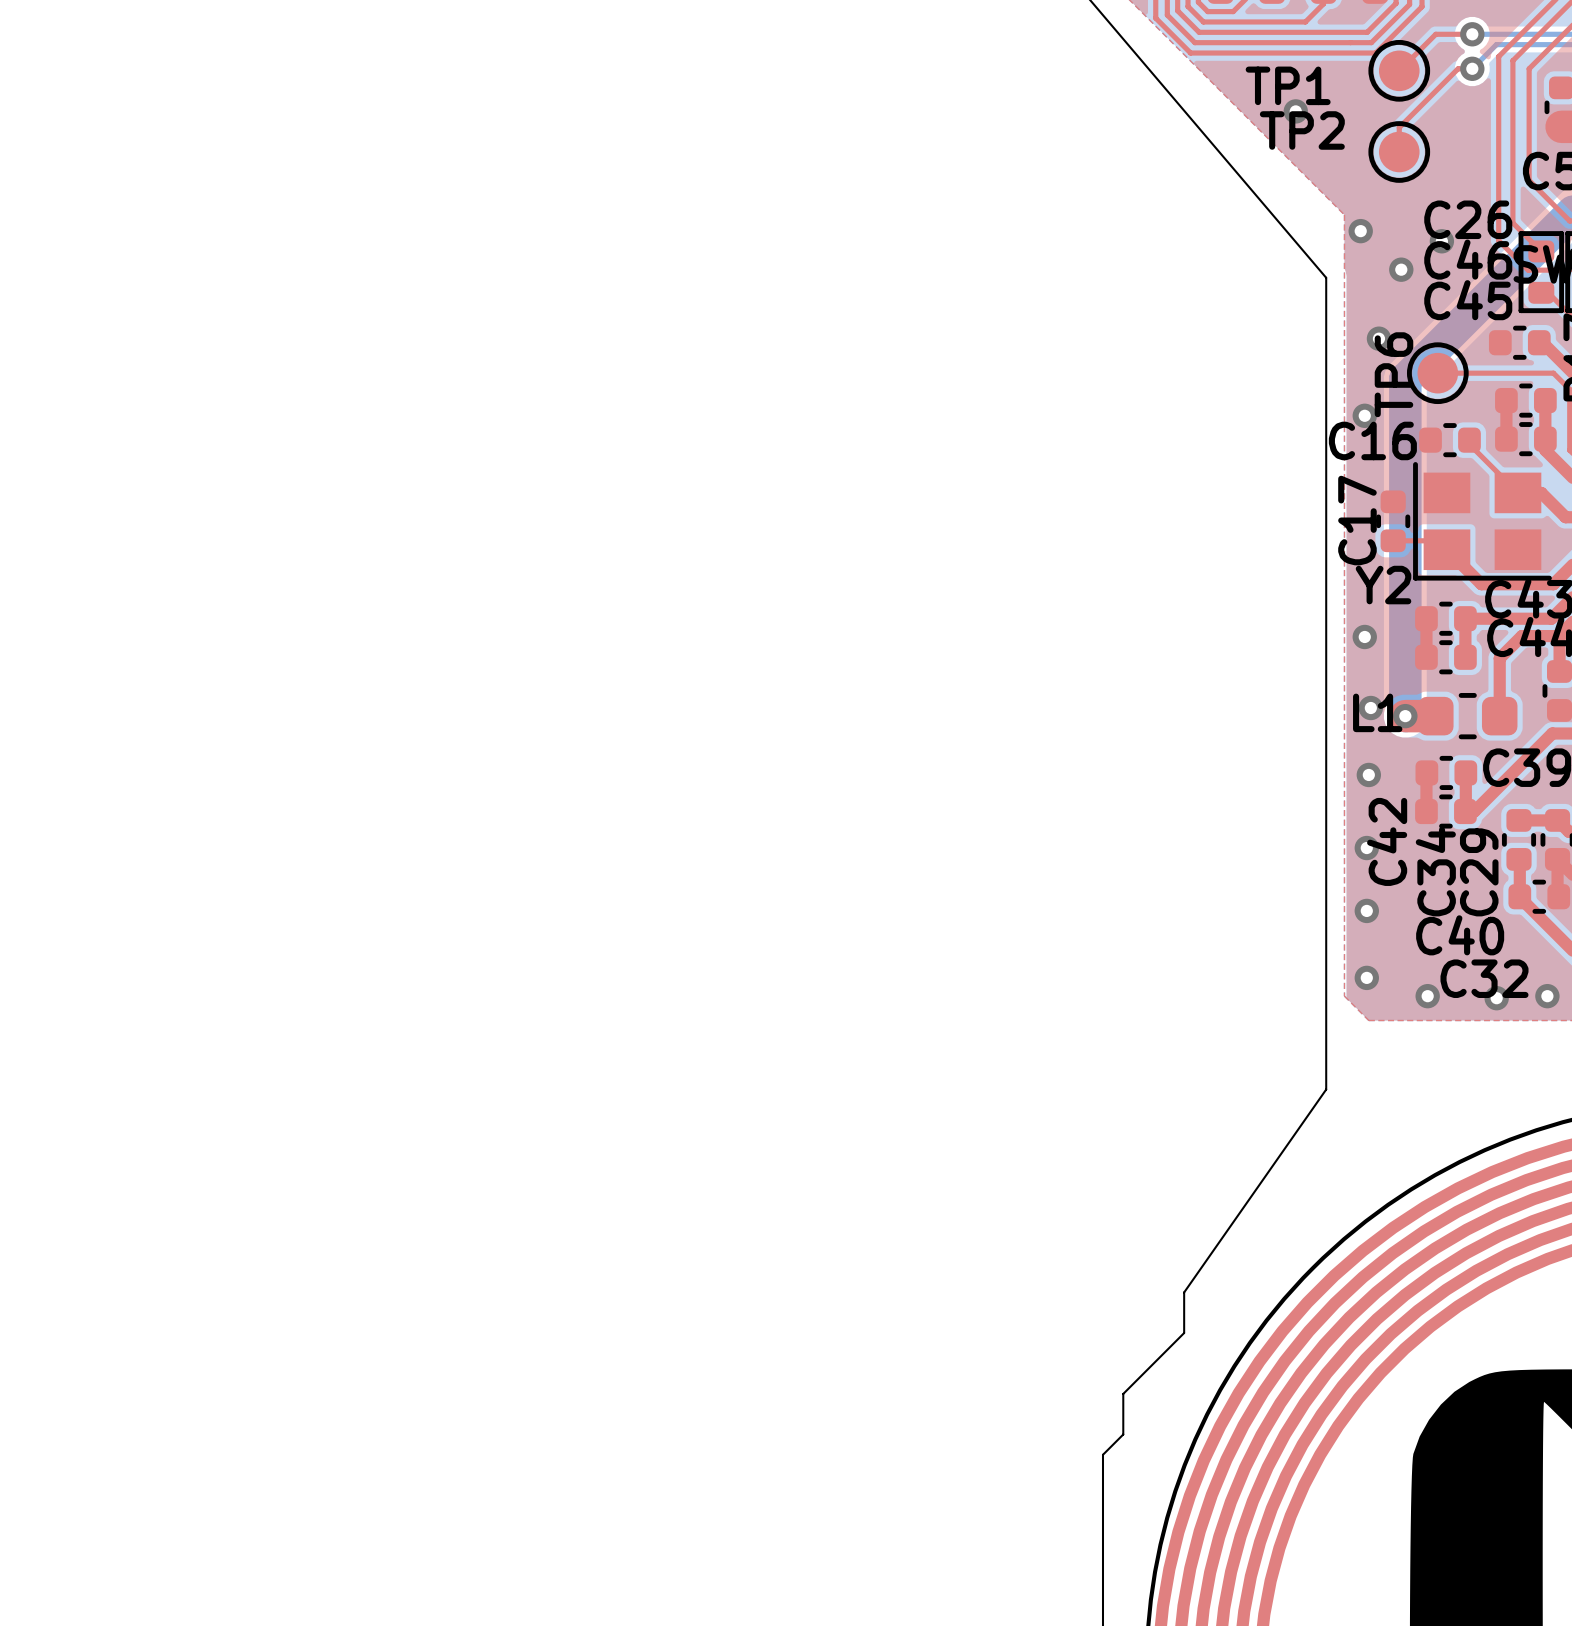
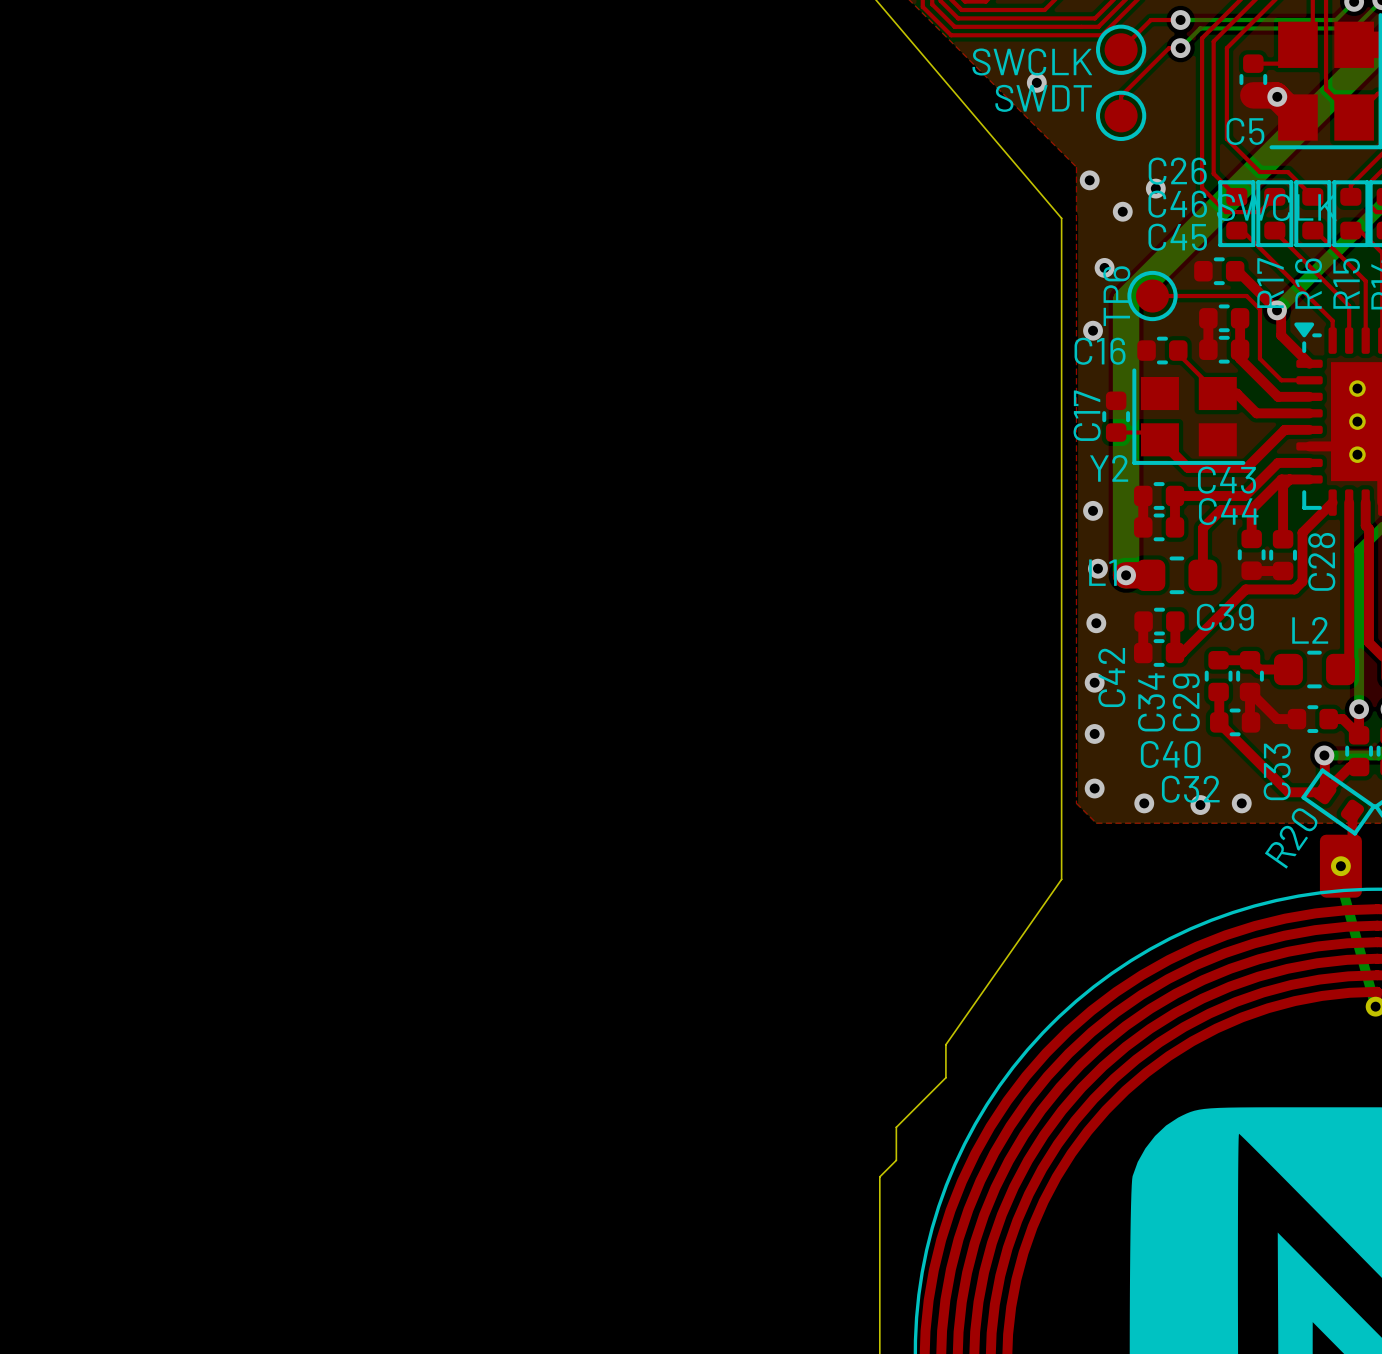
TP1 name: TP1 (1288, 85) -> SWCLK (1032, 62)
TP2 name: TP2 (1302, 130) -> SWDT (1043, 98)

